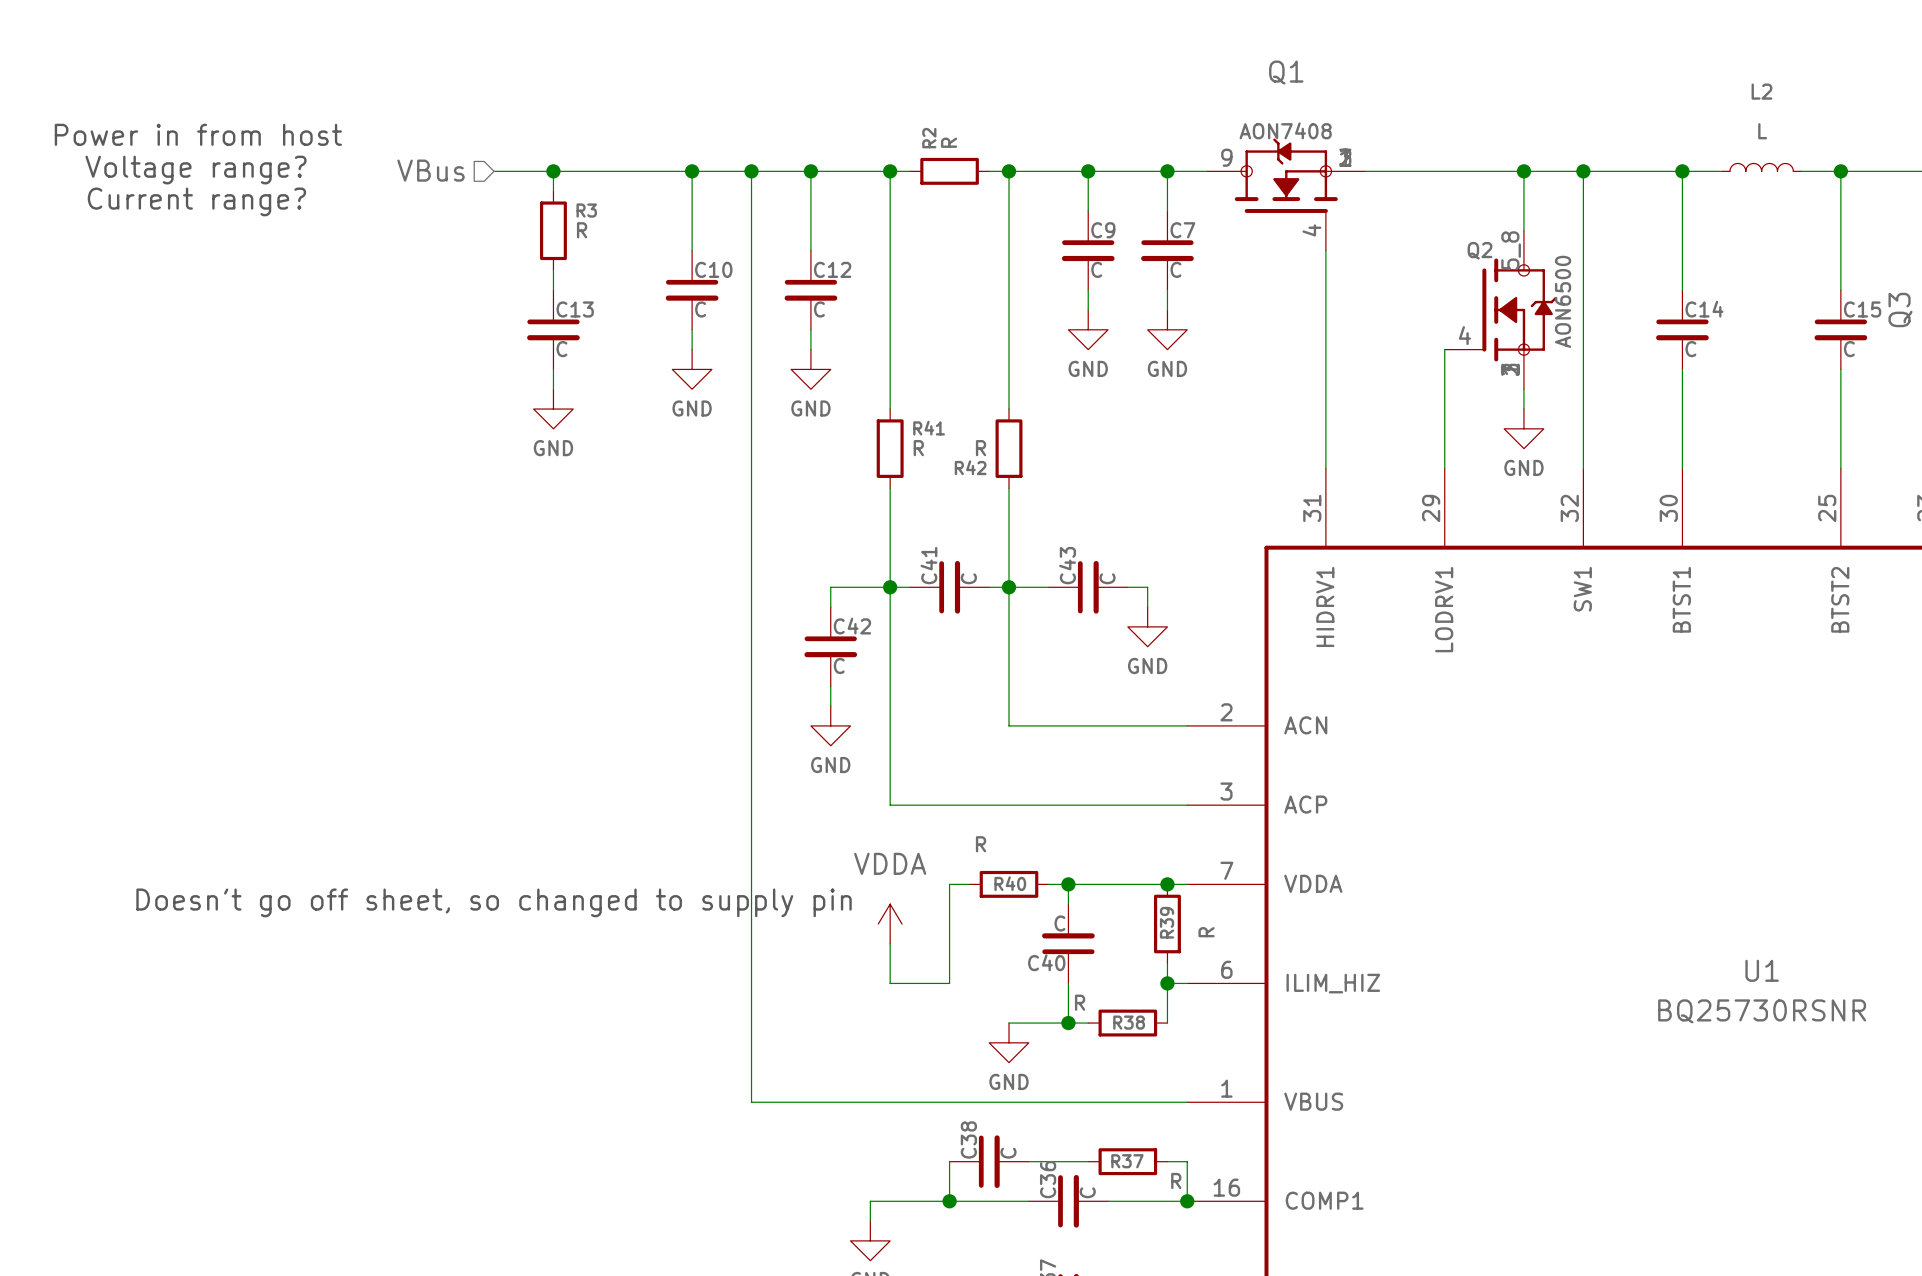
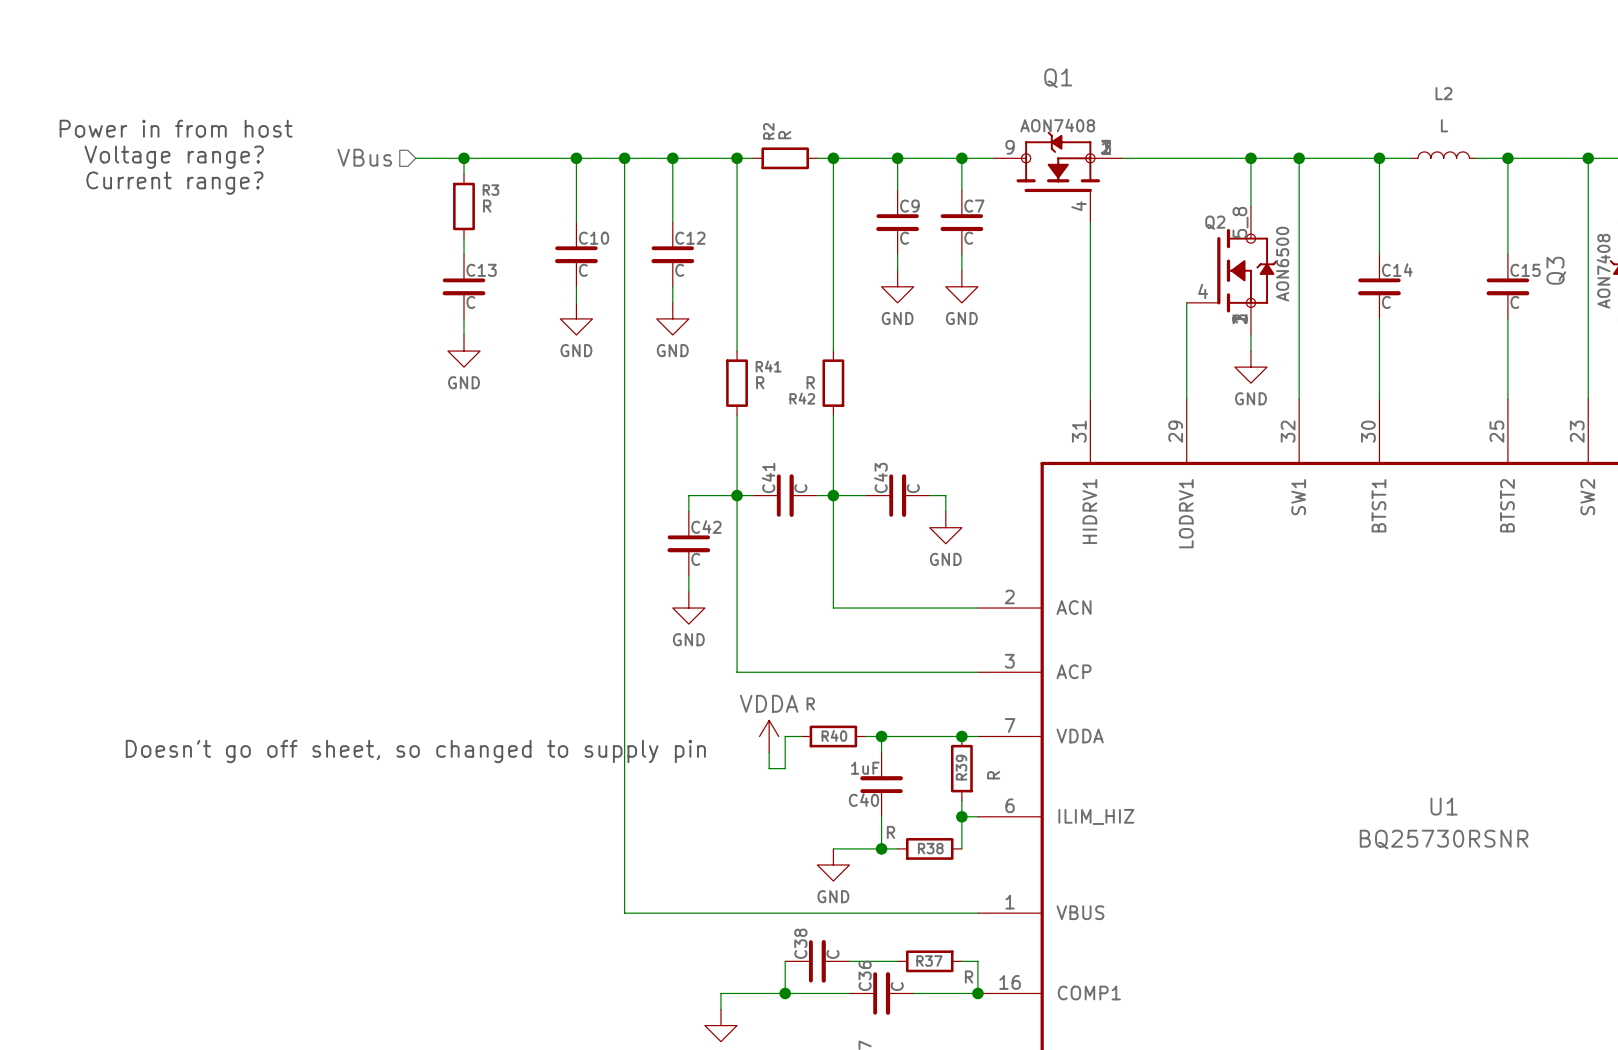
power symbol text position: VDDA (890, 863) -> VDDA (769, 703)
C40 value: C (1059, 923) -> 1uF (865, 768)
power symbol position: VDDA (890, 924) -> VDDA (769, 736)
wire: (949, 924) (949, 983) (890, 983) (890, 943) -> (785, 768) (769, 768) (769, 752)

